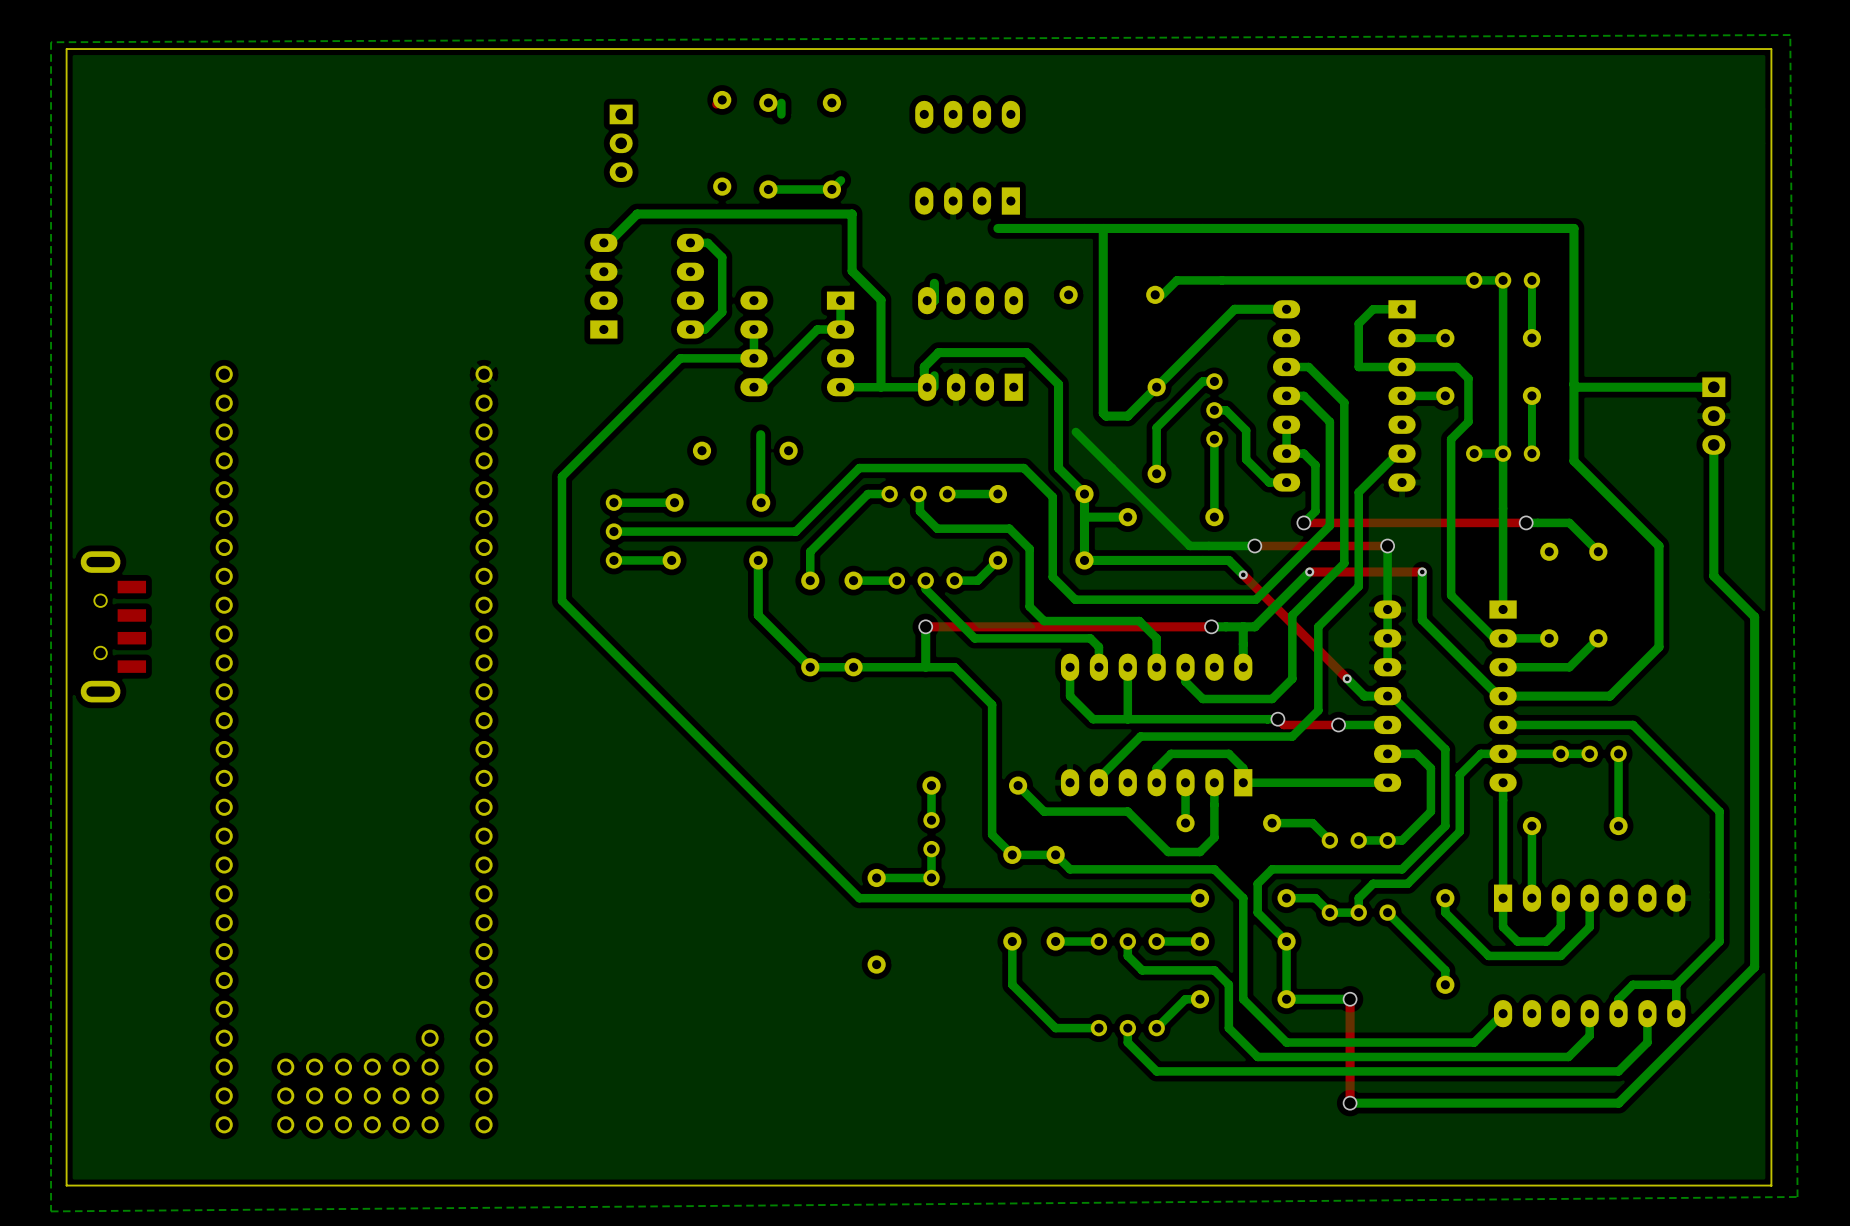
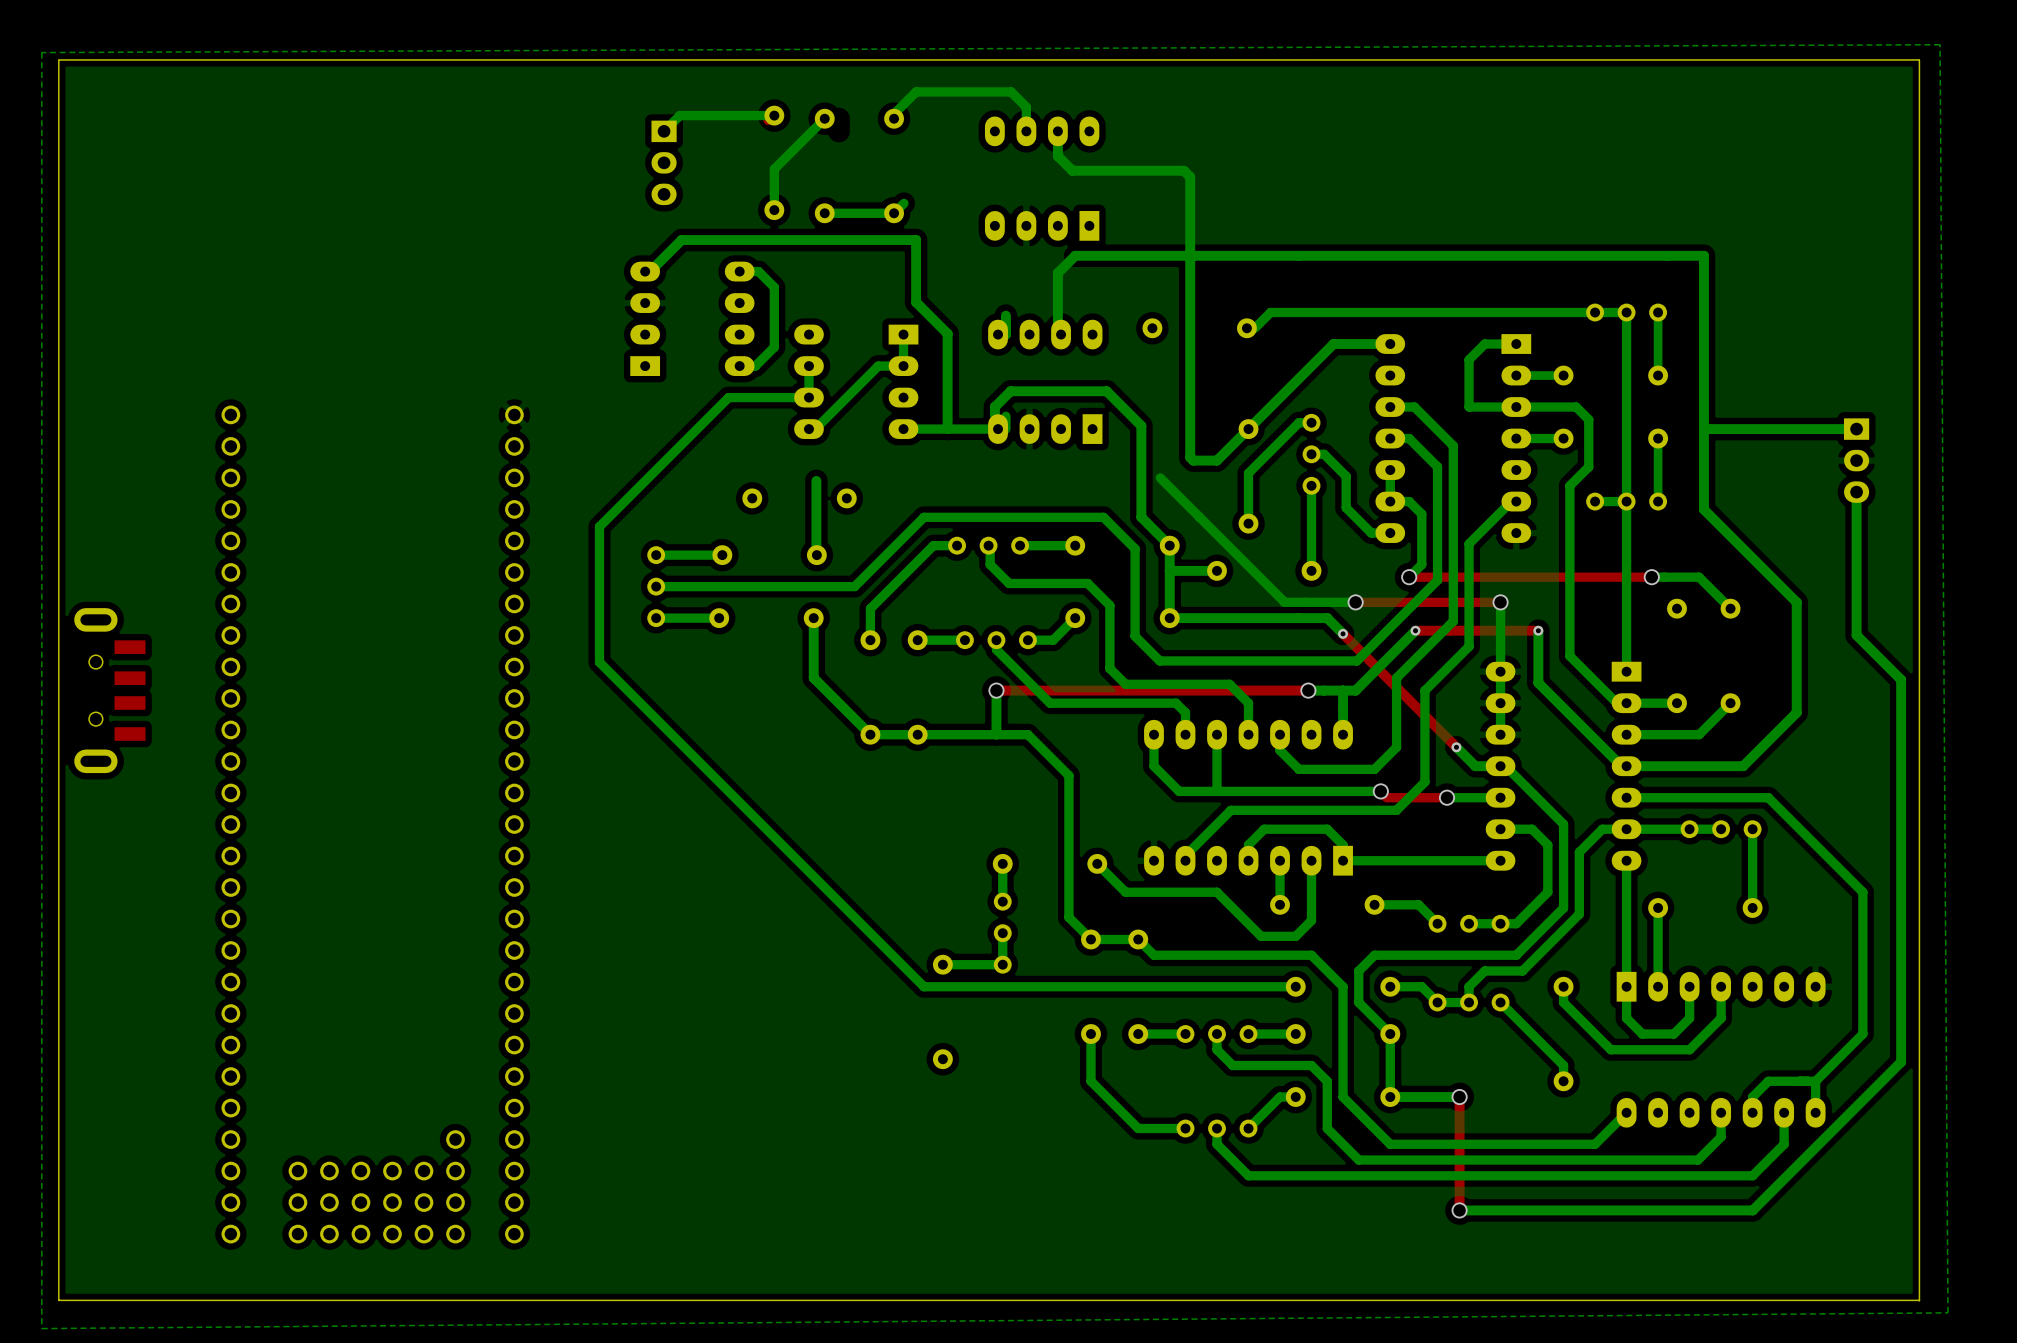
bottom track: none -> (774, 115) (679, 115) (664, 131)
bottom track: none -> (824, 118) (774, 169) (774, 210)
bottom track: (781, 102) (781, 114) -> none
bottom track: none -> (894, 118) (894, 114) (916, 91) (1011, 91) (1026, 107) (1026, 131)
bottom track: none -> (1057, 131) (1057, 156) (1072, 170) (1183, 170) (1190, 177) (1190, 255)
bottom track: none -> (1075, 255) (1057, 273) (1057, 331) (1061, 334)

